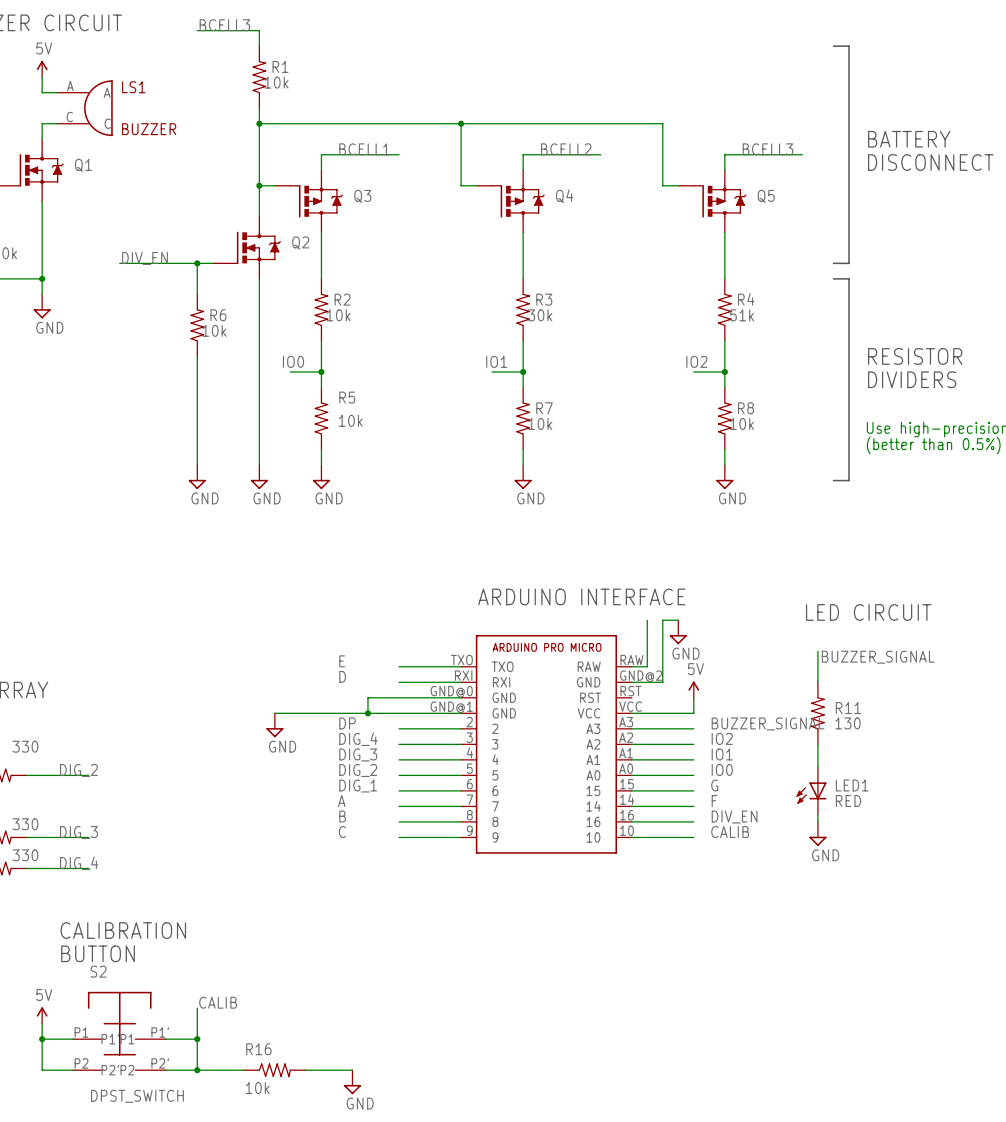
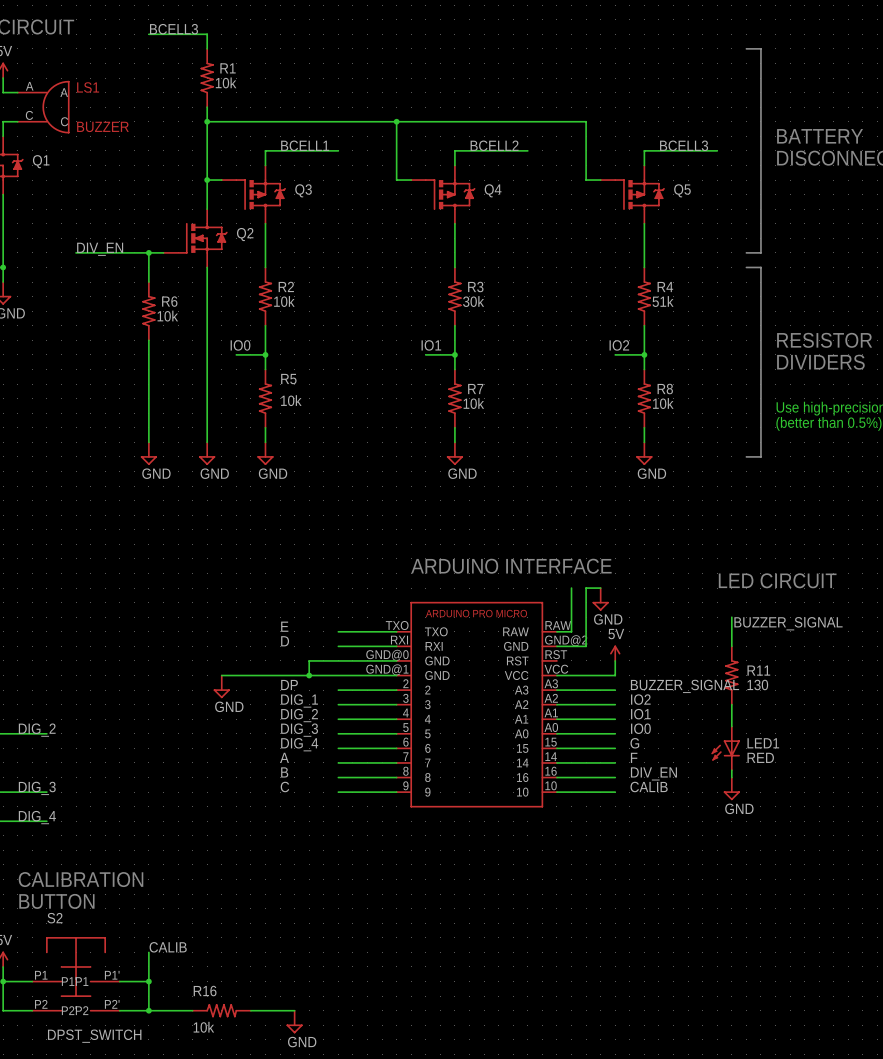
label: DIG_4 (358, 739) -> DIG_1 (299, 700)
label: DIG_3 (358, 754) -> DIG_2 (299, 715)
label: DIG_2 (358, 770) -> DIG_3 (299, 730)
label: DIG_1 (358, 785) -> DIG_4 (299, 744)

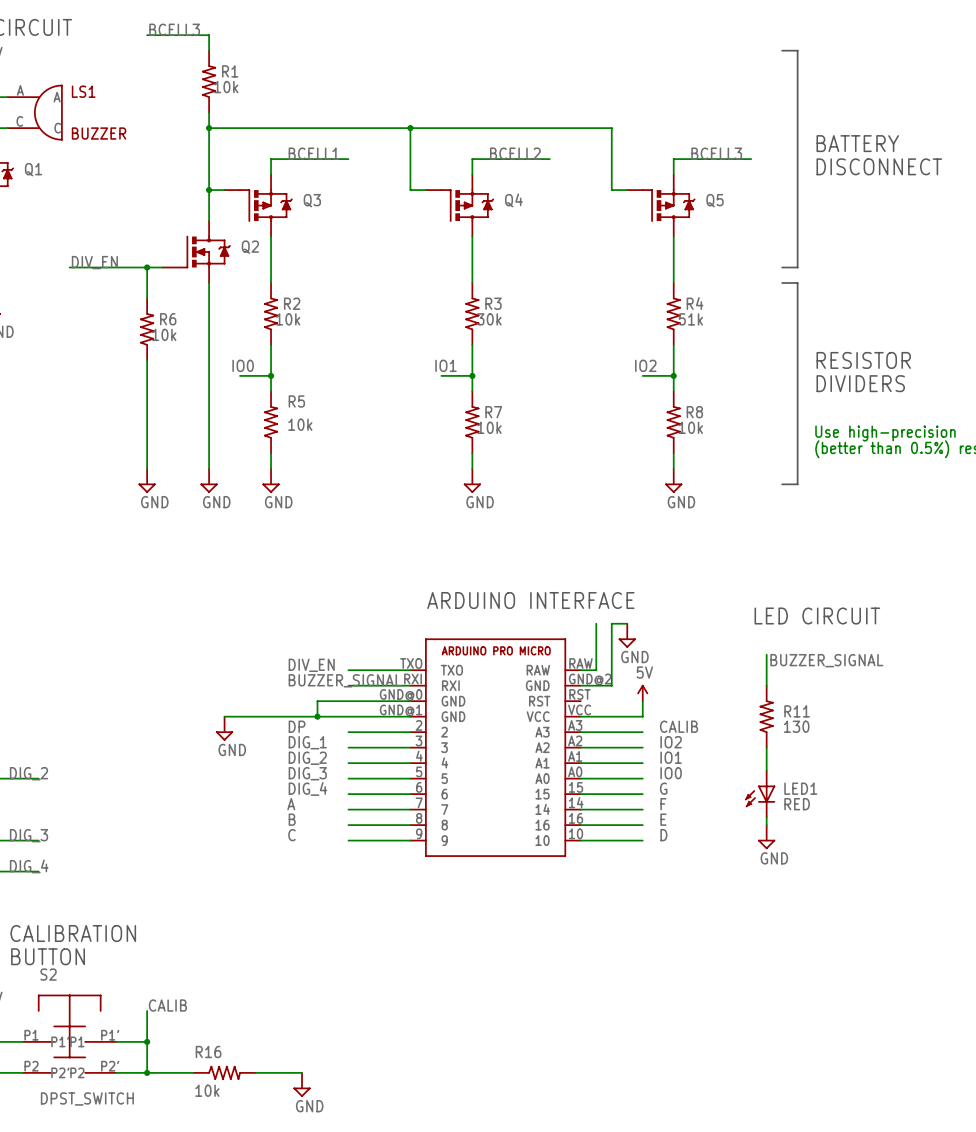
label: E (284, 626) -> DIV_EN (311, 665)
label: D (285, 641) -> BUZZER_SIGNAL (345, 680)
label: BUZZER_SIGNAL (685, 686) -> CALIB (679, 726)
label: DIV_EN (653, 773) -> E (663, 819)
label: CALIB (649, 787) -> D (663, 835)

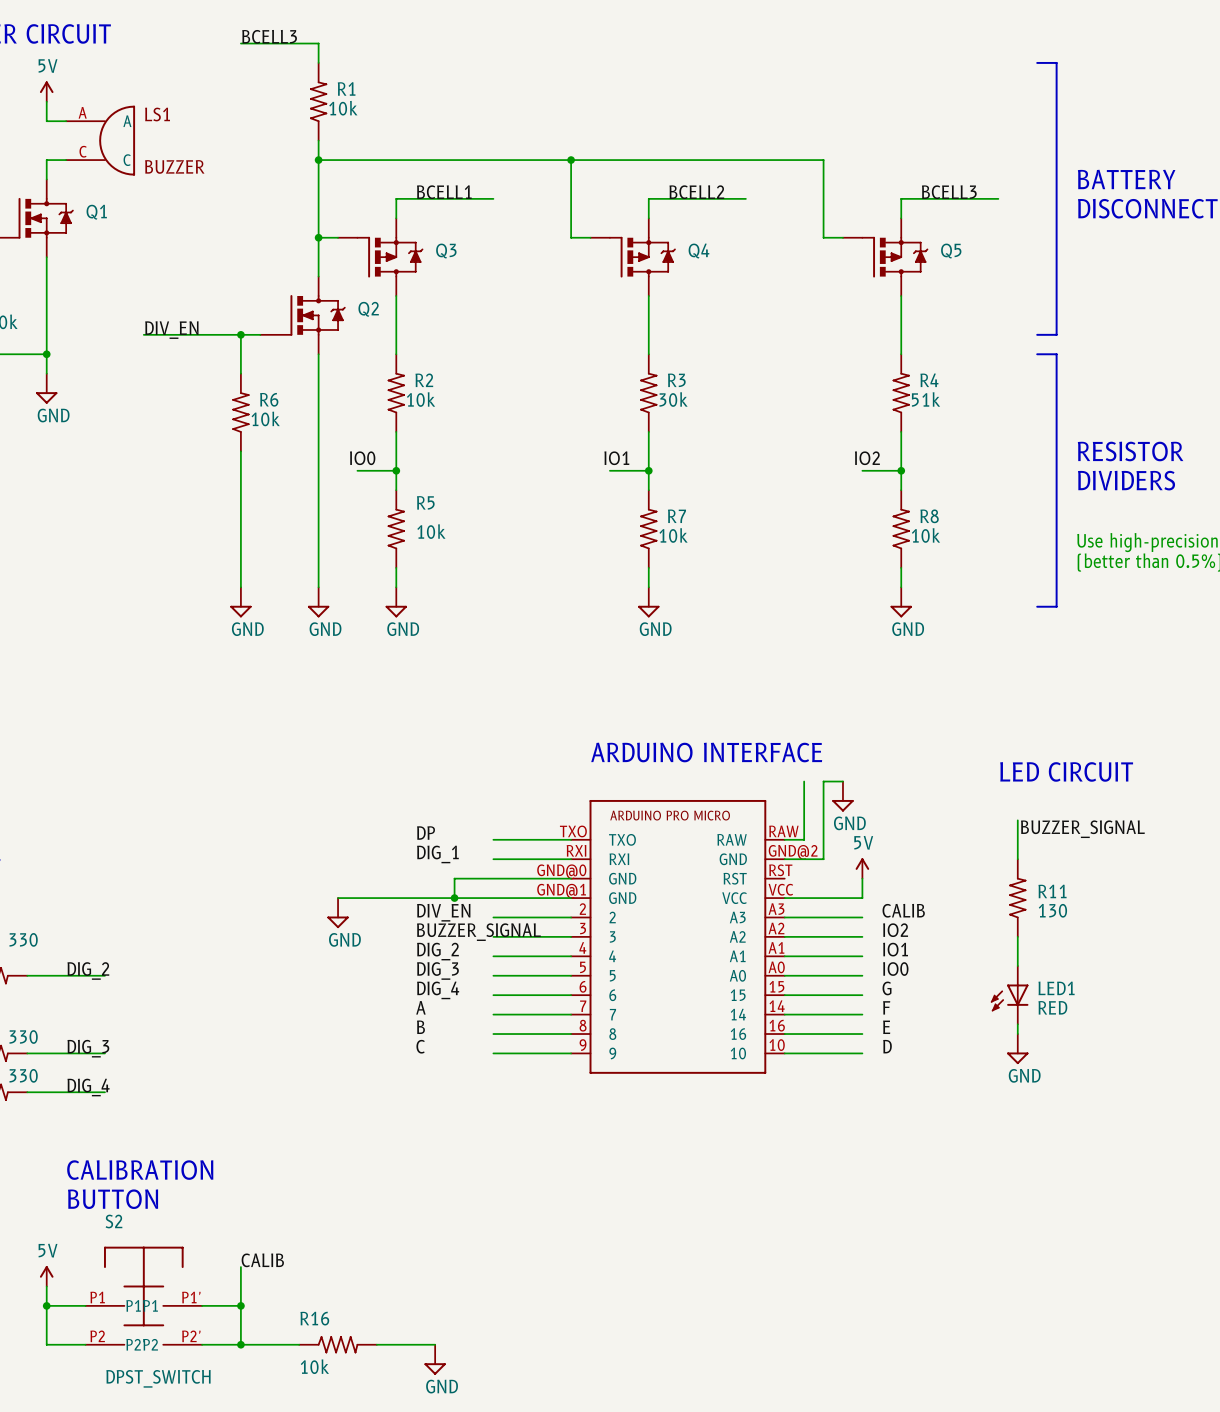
label: DIV_EN (311, 665) -> DP (426, 833)
label: BUZZER_SIGNAL (345, 680) -> DIG_1 (437, 854)
label: DP (297, 726) -> DIV_EN (443, 912)
label: DIG_1 (307, 742) -> BUZZER_SIGNAL (478, 932)

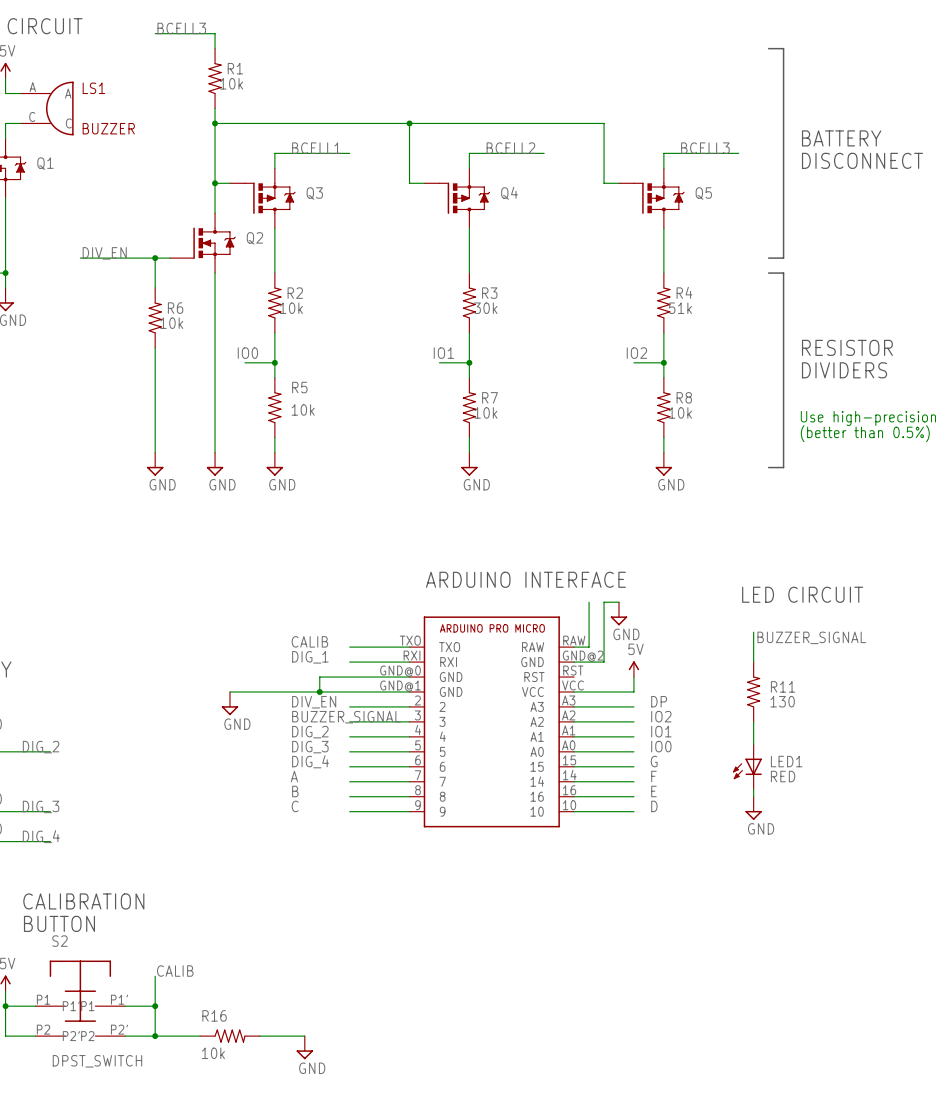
label: DP (426, 833) -> CALIB (309, 641)
label: CALIB (903, 910) -> DP (659, 701)

